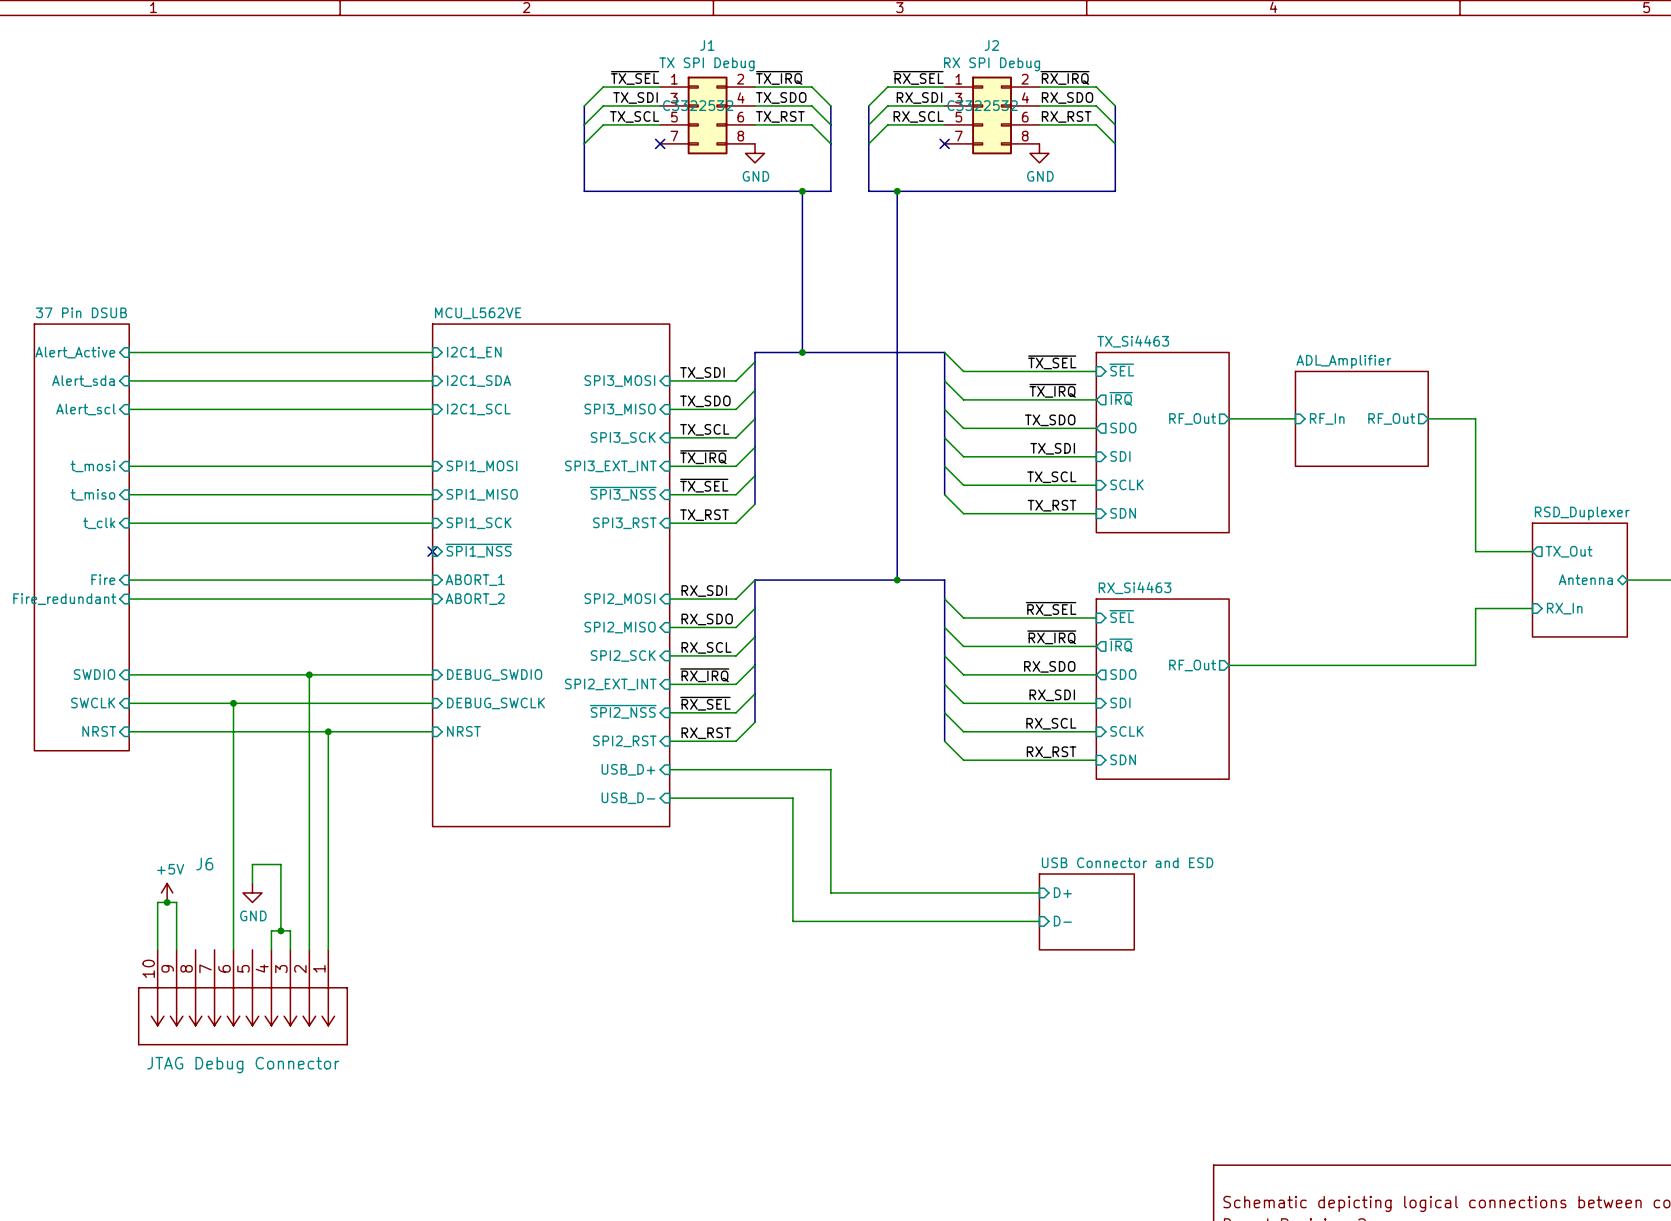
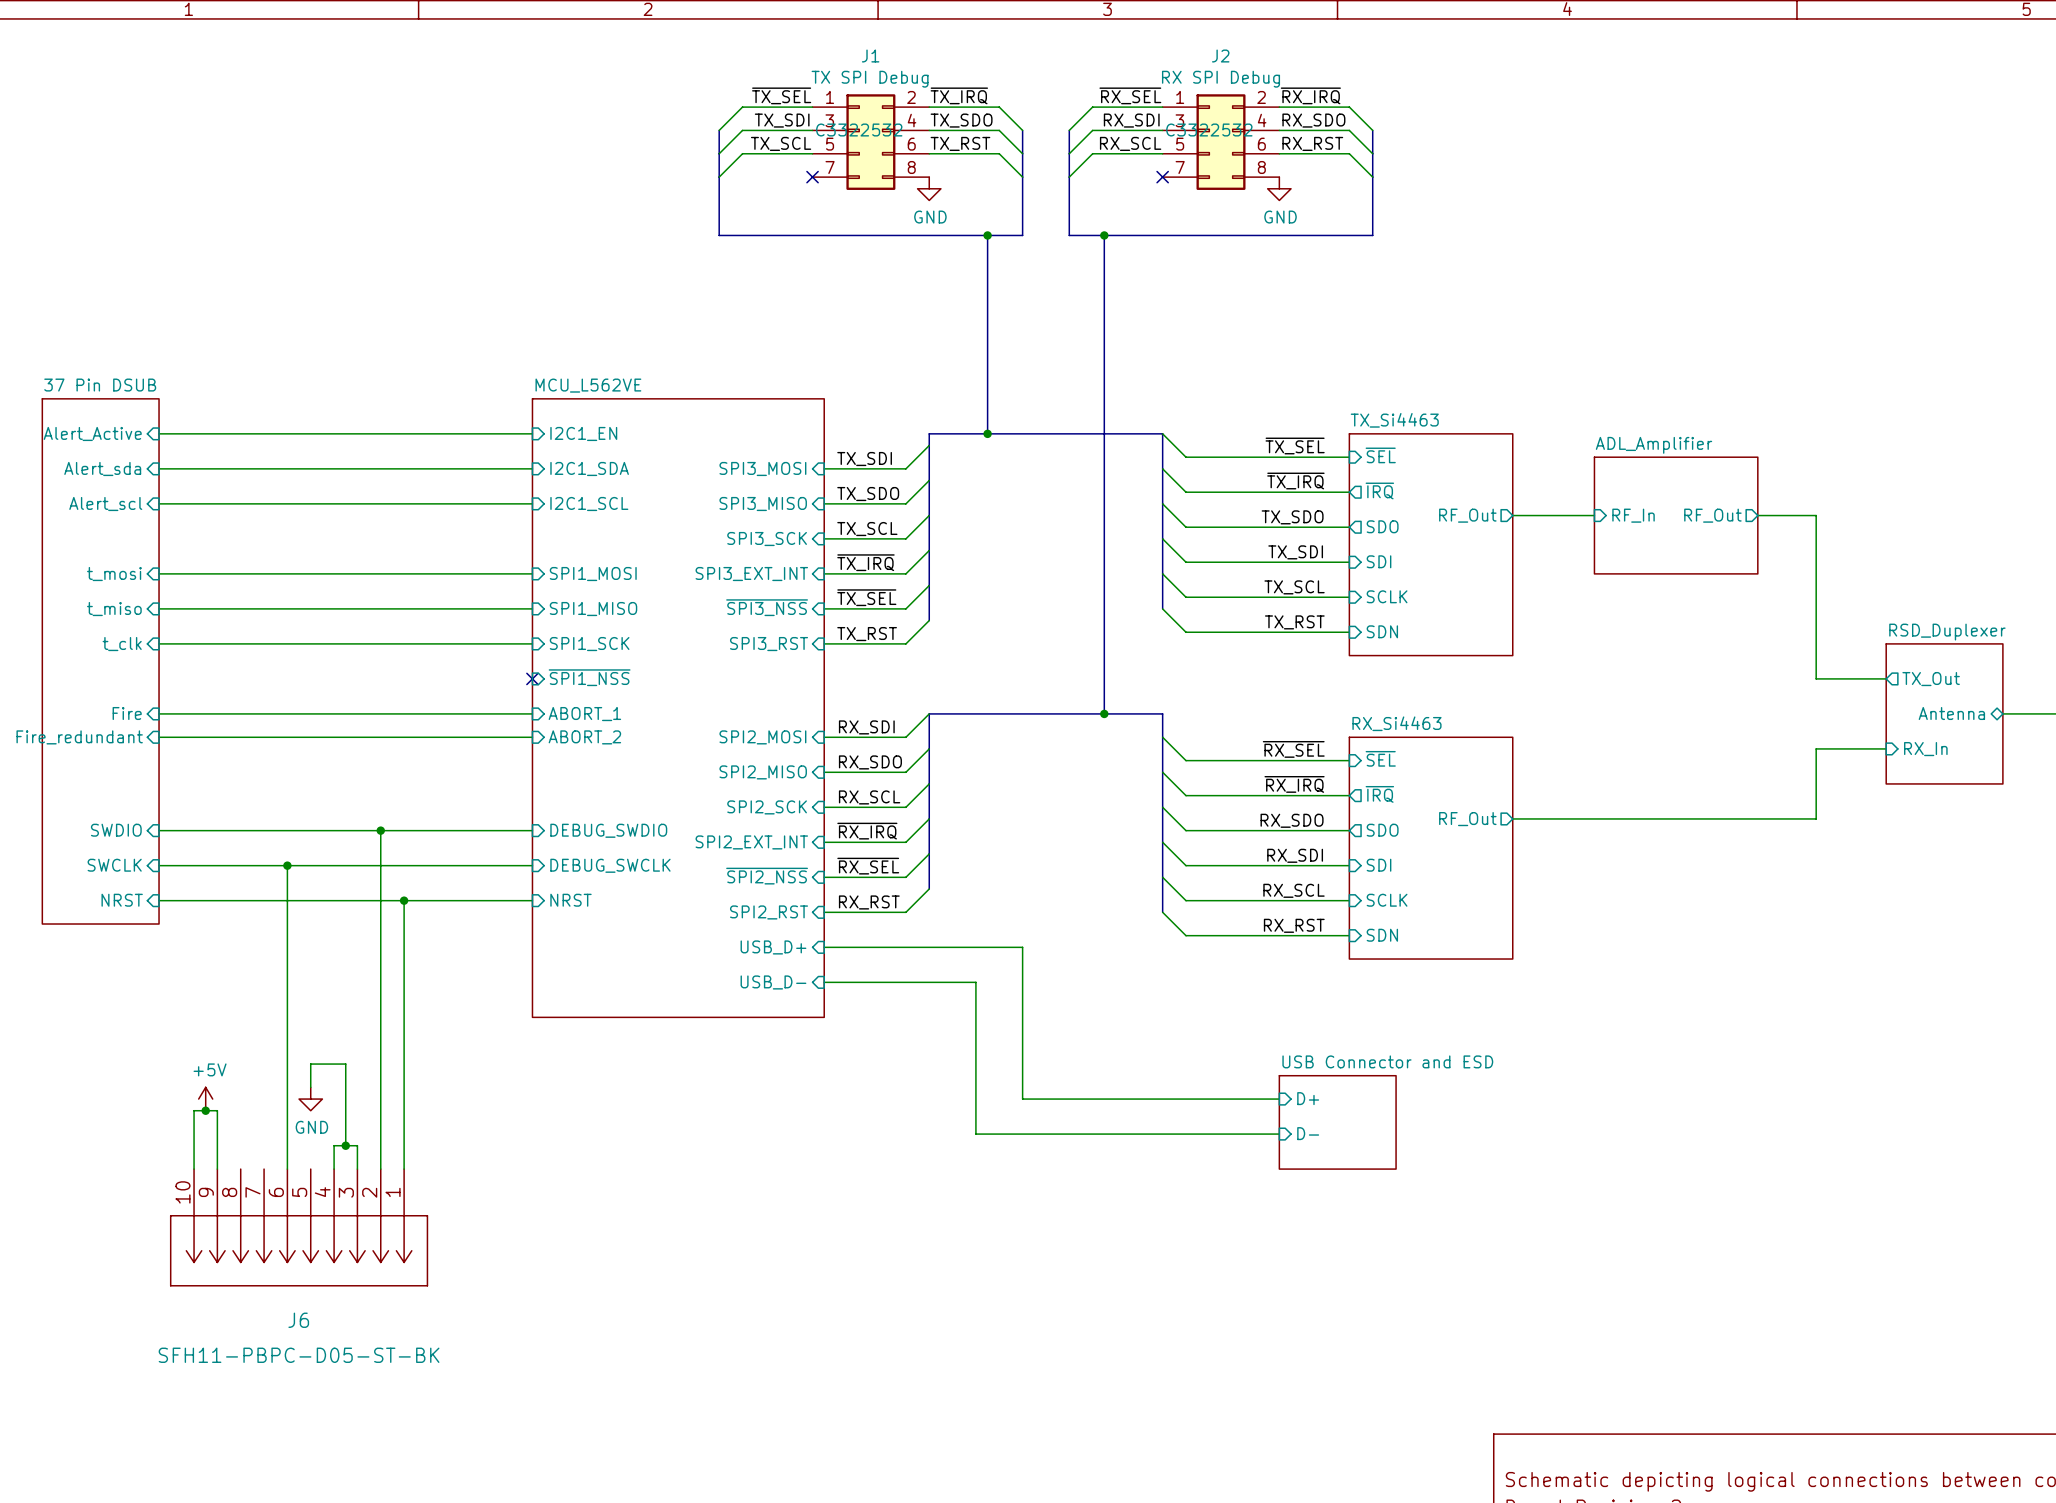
J6 name position: J6 (204, 864) -> J6 (298, 1320)
J6 value: JTAG Debug Connector (243, 1065) -> SFH11-PBPC-D05-ST-BK (299, 1355)

